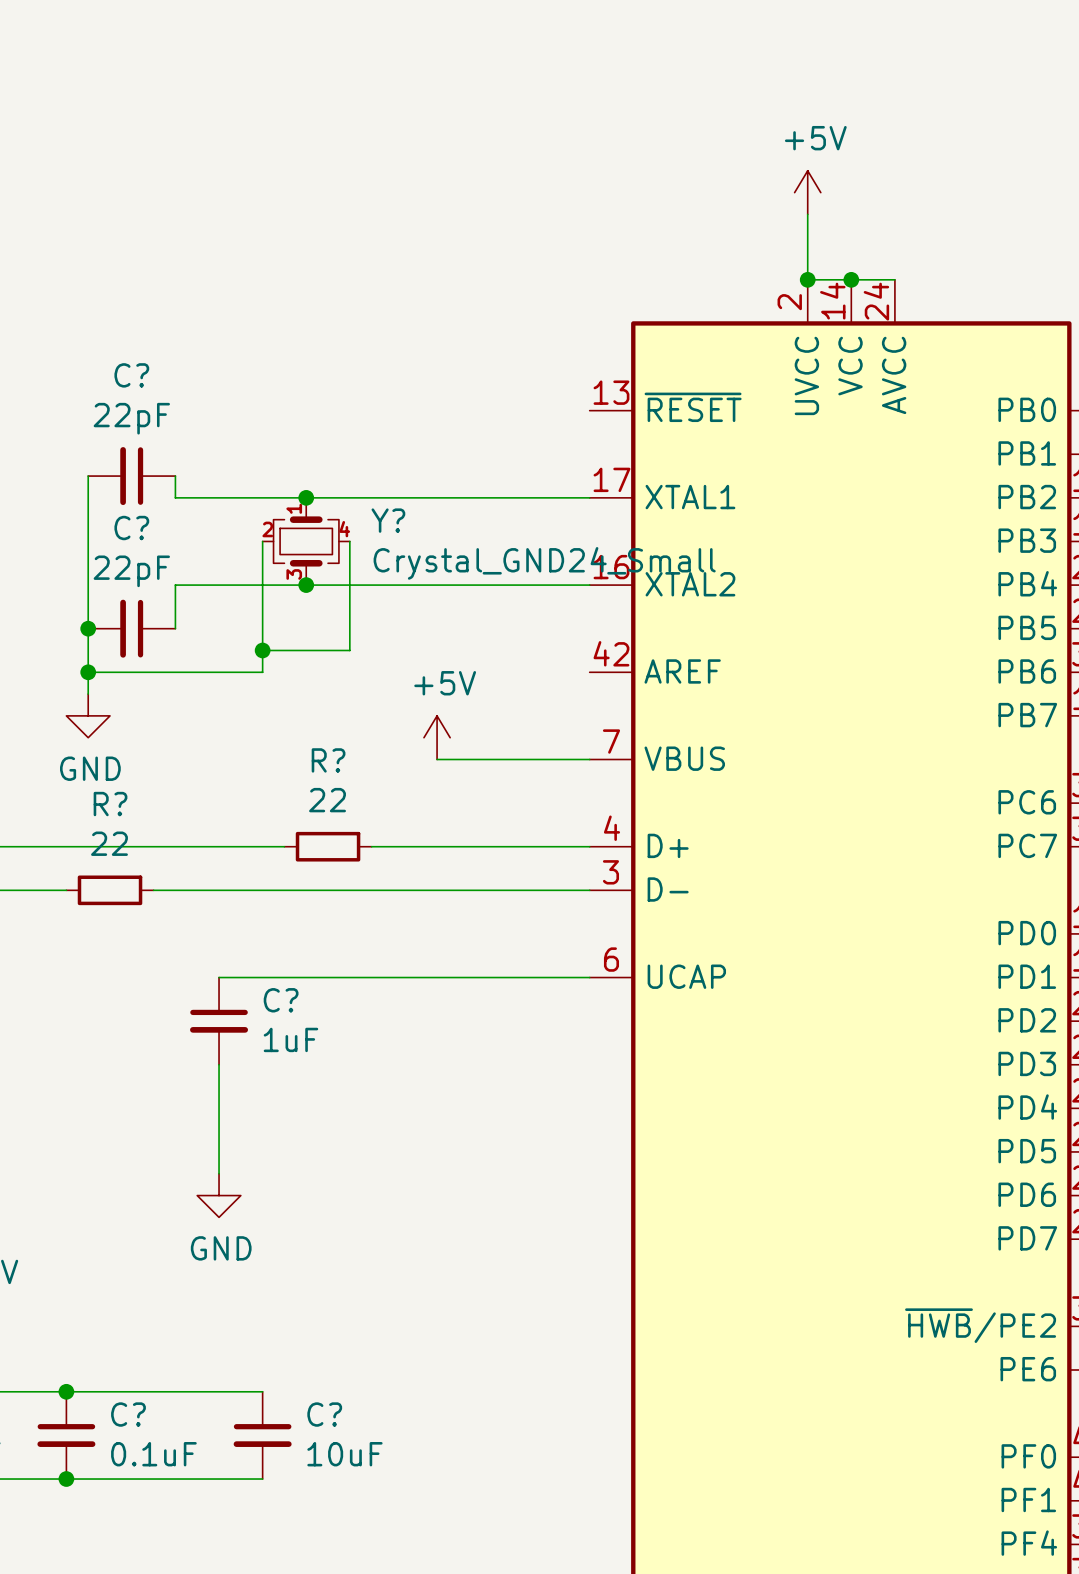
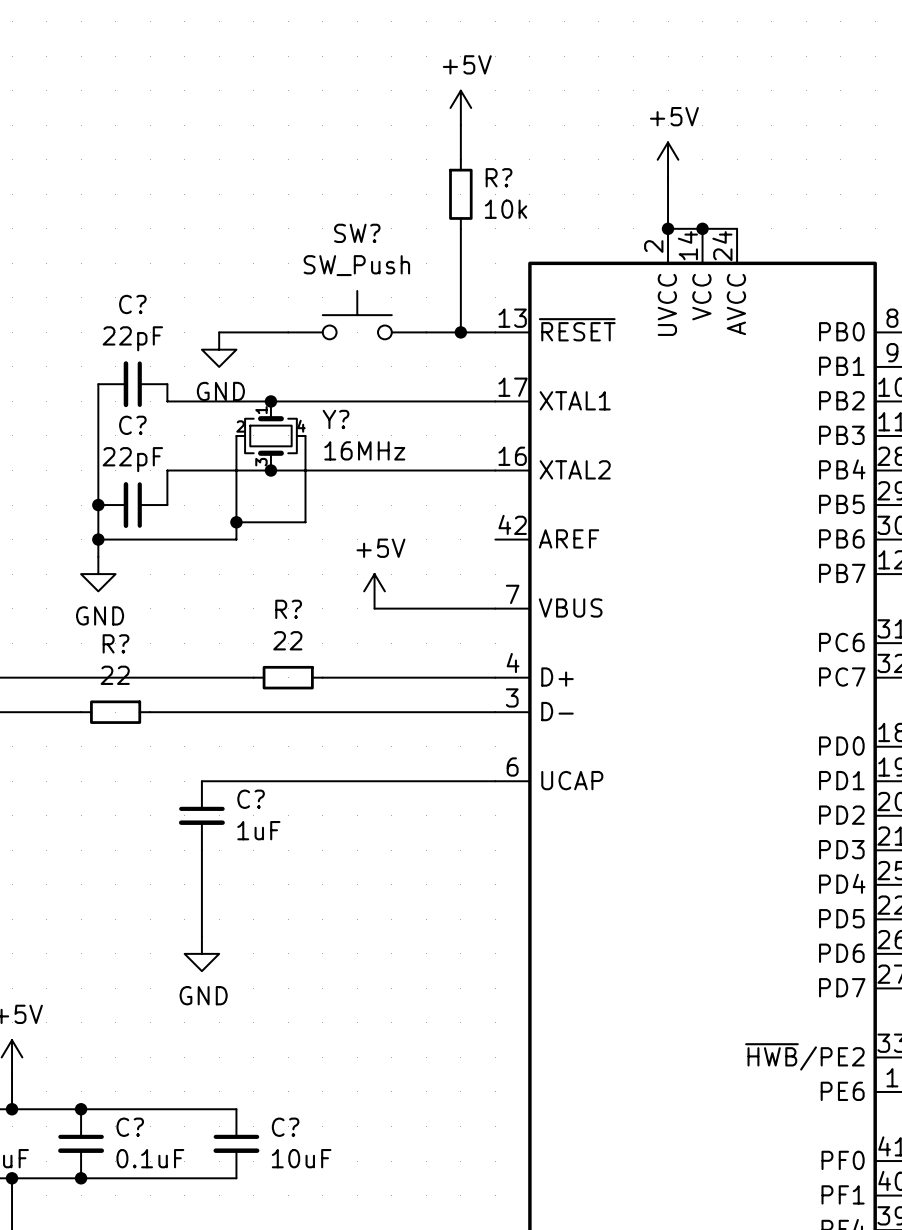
power symbol: none -> +5V (460, 107)
wire: none -> (460, 125) (460, 159)
R?: none -> 10k (460, 194)
wire: none -> (460, 228) (460, 332)
SW?: none -> SW_Push (357, 315)
wire: none -> (219, 332) (288, 332)
wire: none -> (426, 332) (495, 332)
junction: none -> (460, 332)
power symbol: none -> GND (219, 349)
Y? value: Crystal_GND24_Small (544, 563) -> 16MHz (364, 450)

